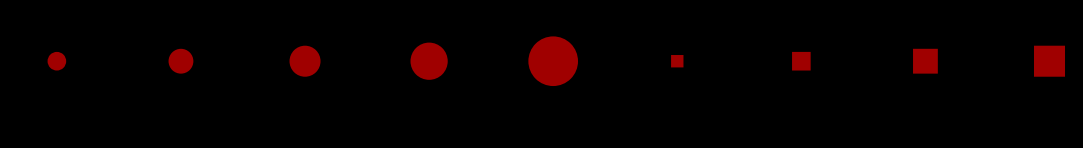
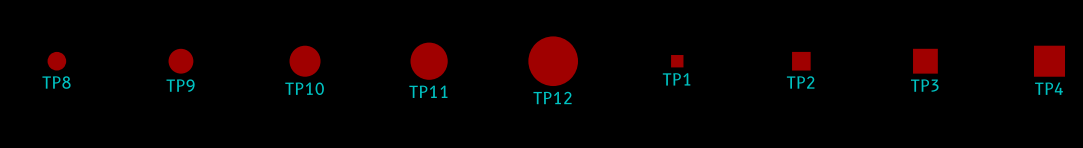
TP1 name: none -> TP1 (676, 79)
TP8 name: none -> TP8 (56, 82)
TP2 name: none -> TP2 (800, 82)
TP9 name: none -> TP9 (180, 85)
TP3 name: none -> TP3 (924, 85)
TP10 name: none -> TP10 (304, 88)
TP4 name: none -> TP4 (1049, 88)
TP11 name: none -> TP11 (428, 91)
TP12 name: none -> TP12 (552, 97)

